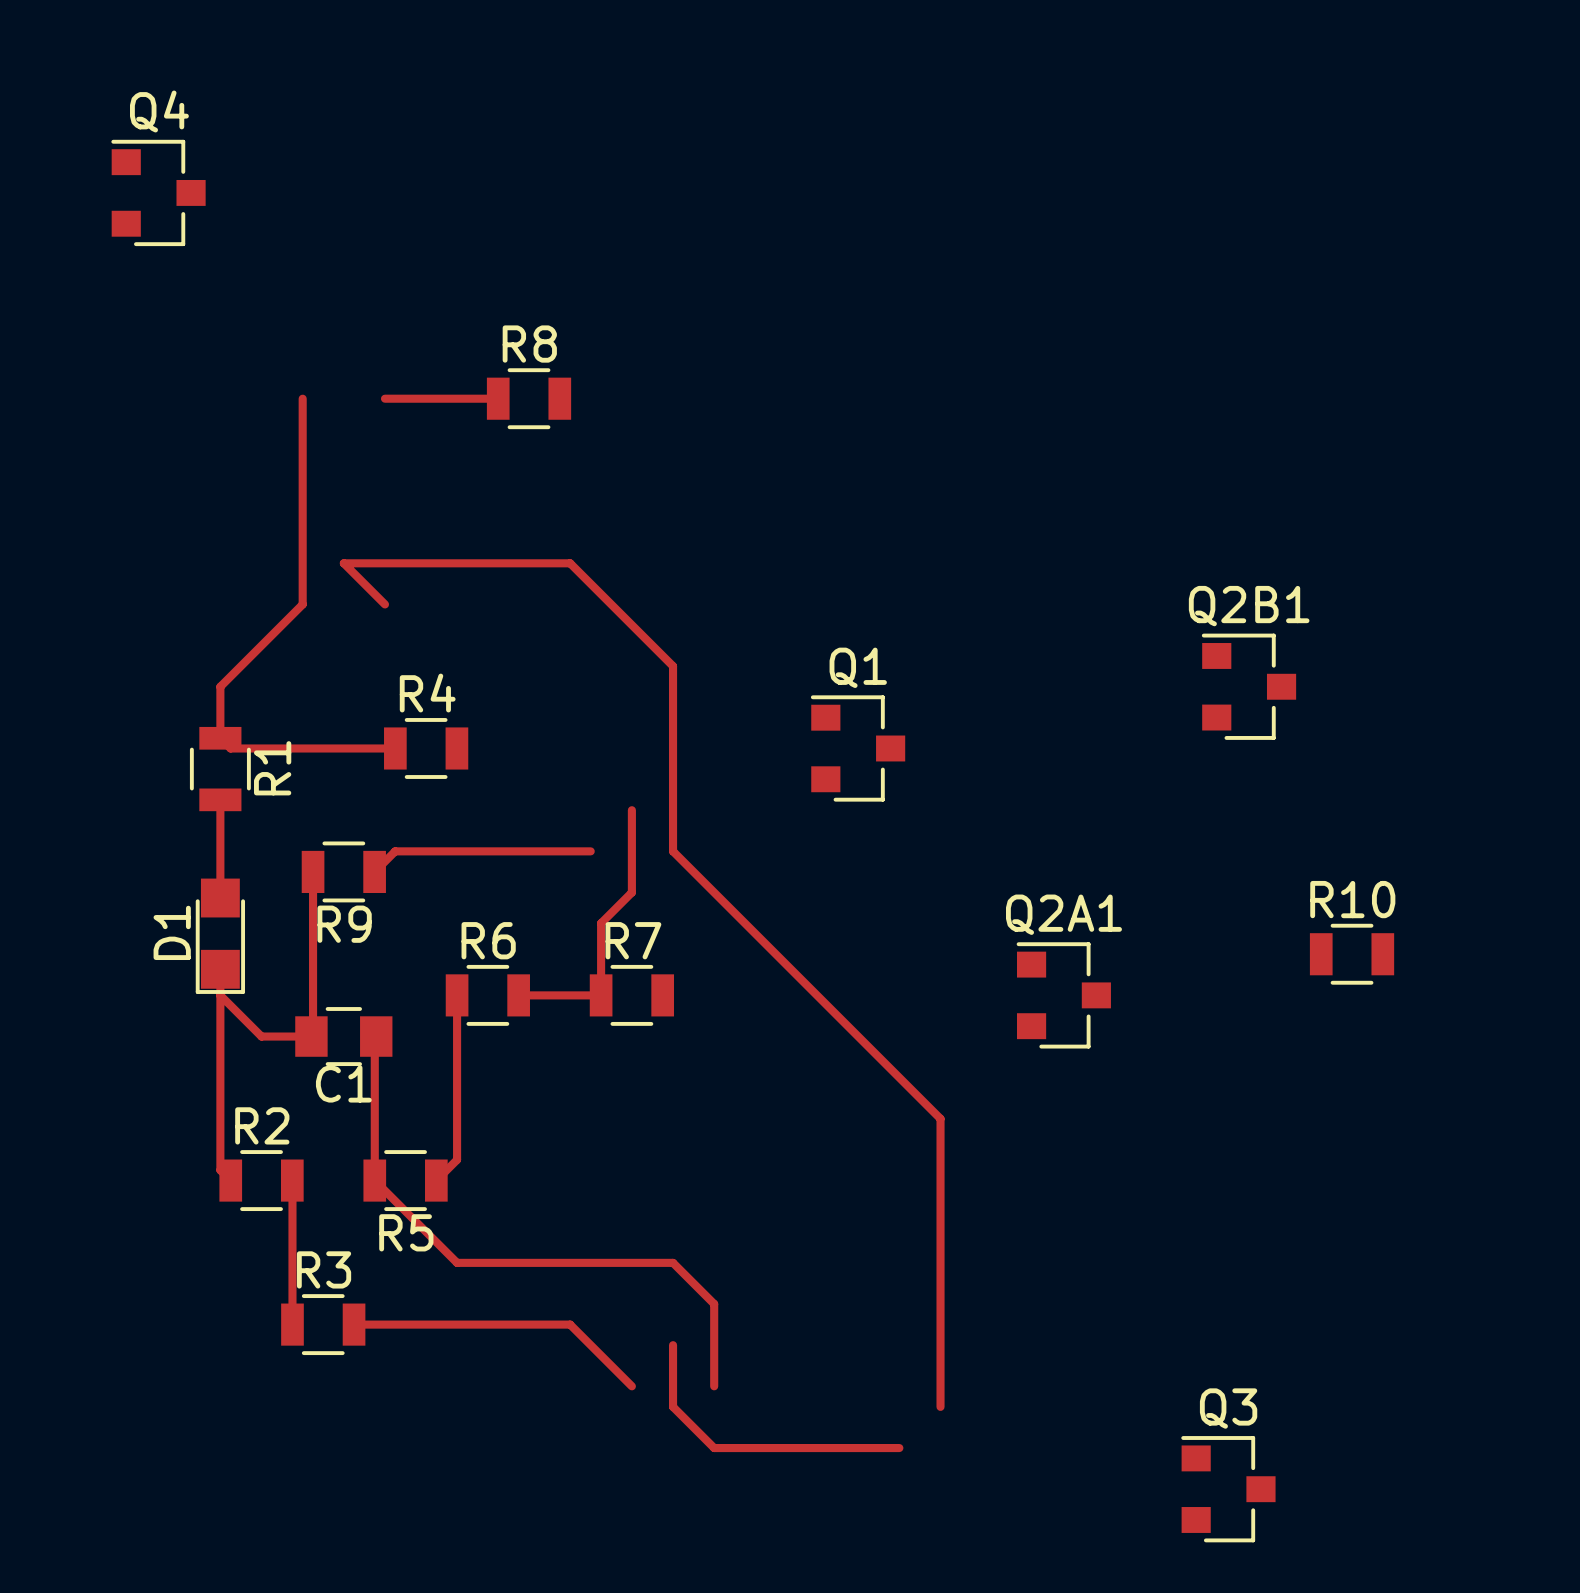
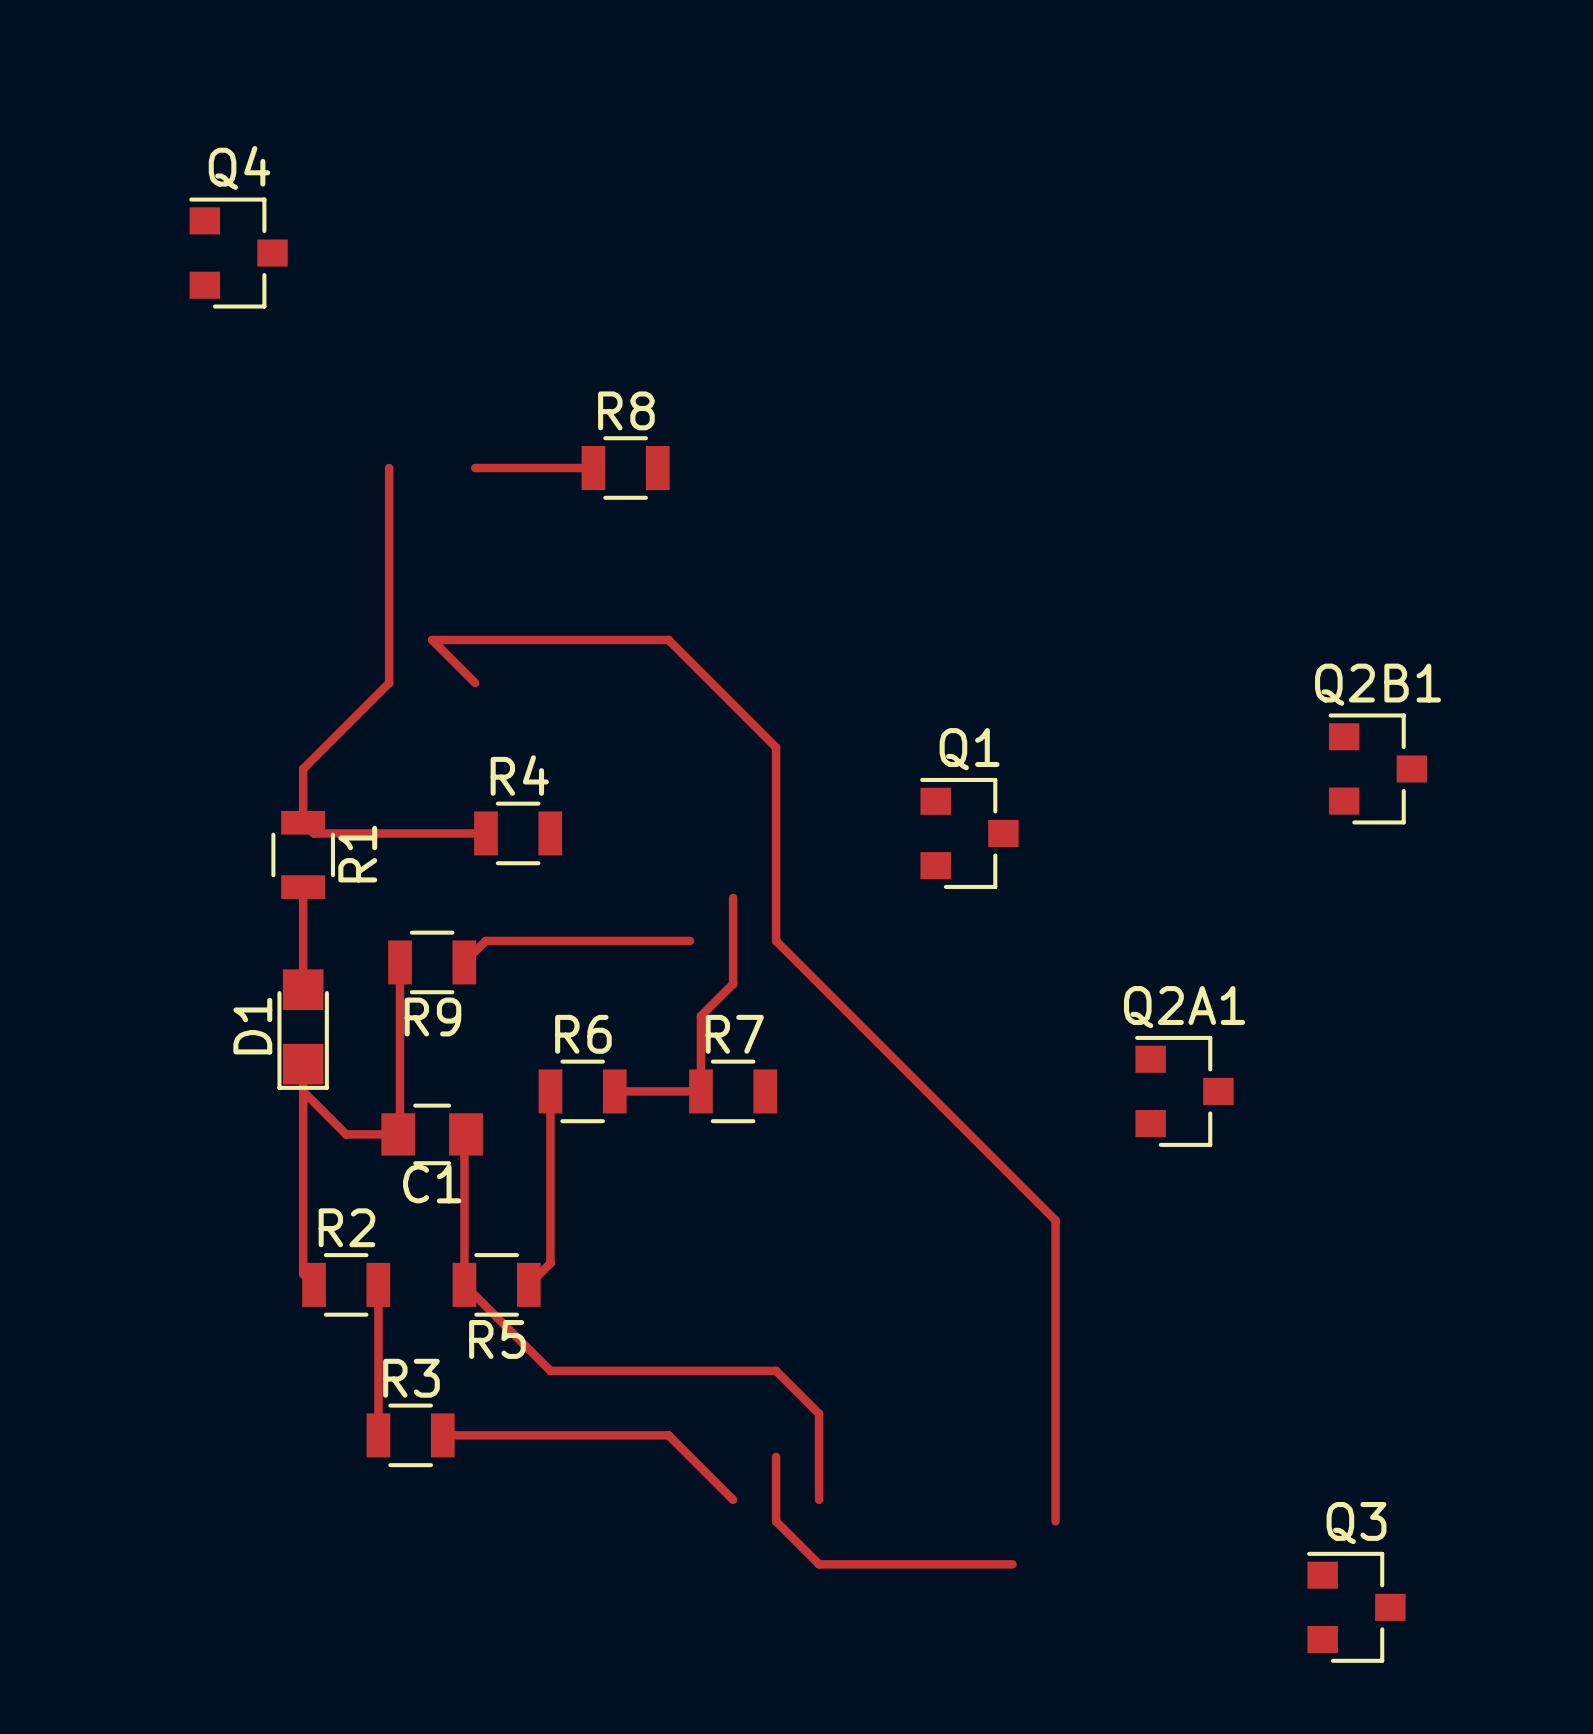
R10: (1352, 954) -> none

